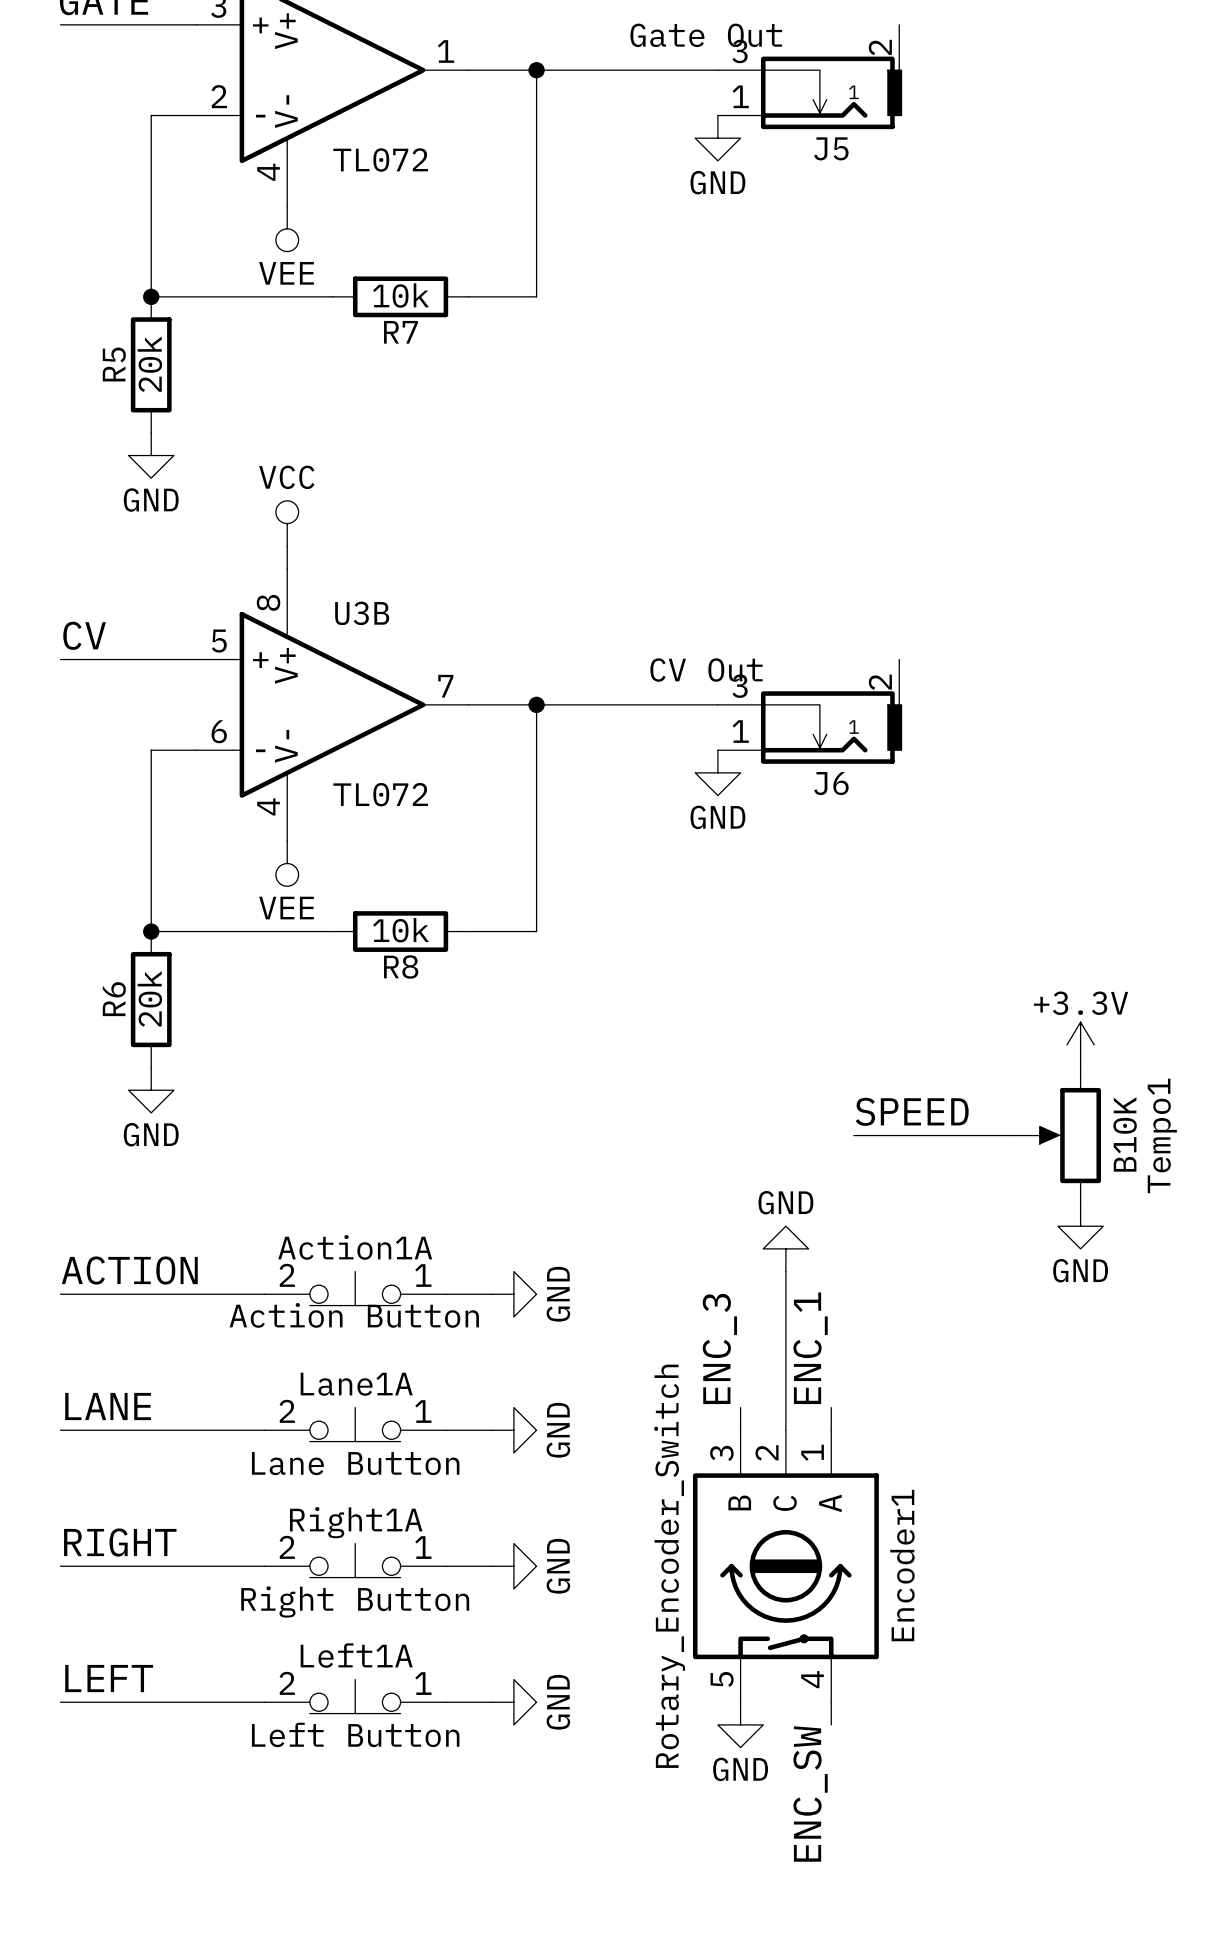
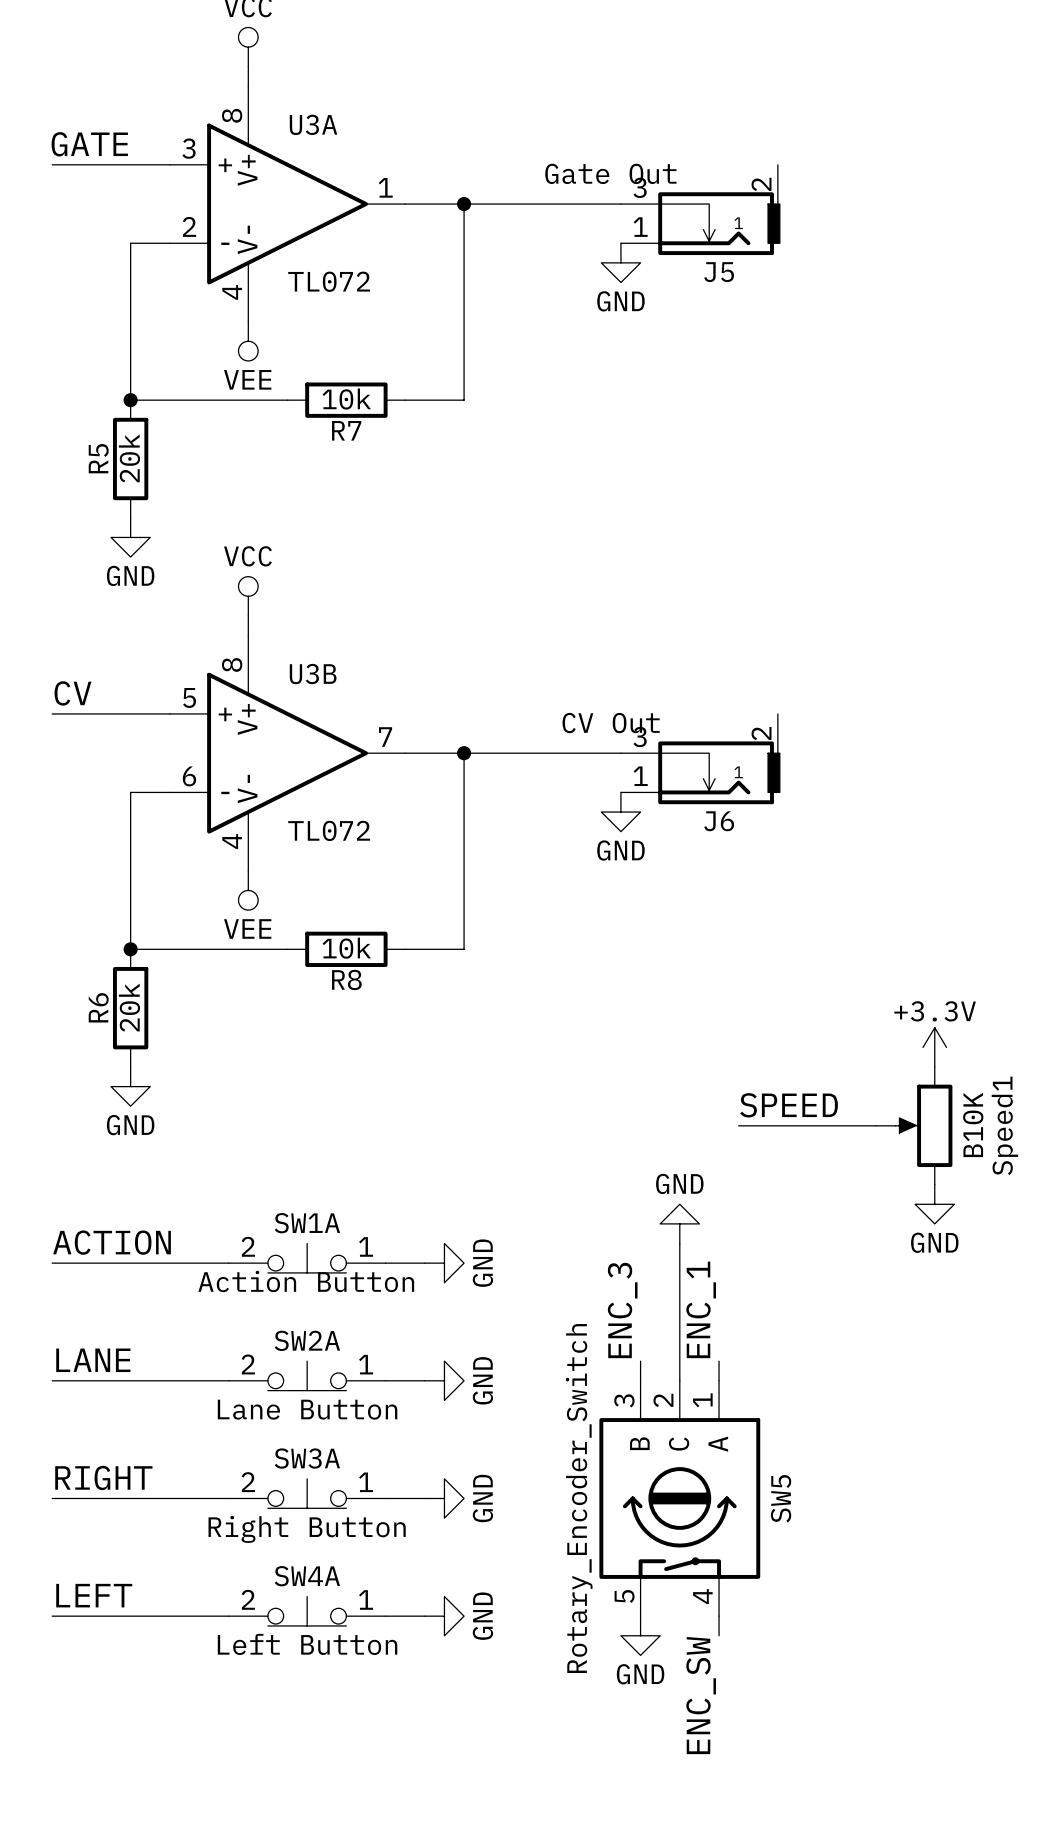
Tempo1 name: Tempo1 (1162, 1135) -> Speed1 (1004, 1125)
Action1A name: Action1A (355, 1247) -> SW1A (307, 1223)
Lane1A name: Lane1A (356, 1384) -> SW2A (307, 1340)
Right1A name: Right1A (356, 1522) -> SW3A (307, 1458)
Encoder1 name: Encoder1 (902, 1565) -> SW5 (781, 1498)
Left1A name: Left1A (356, 1655) -> SW4A (307, 1576)

